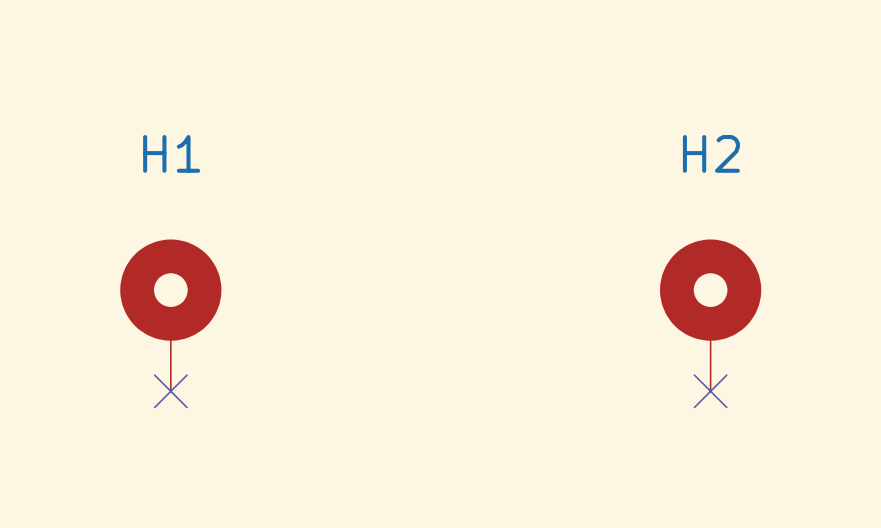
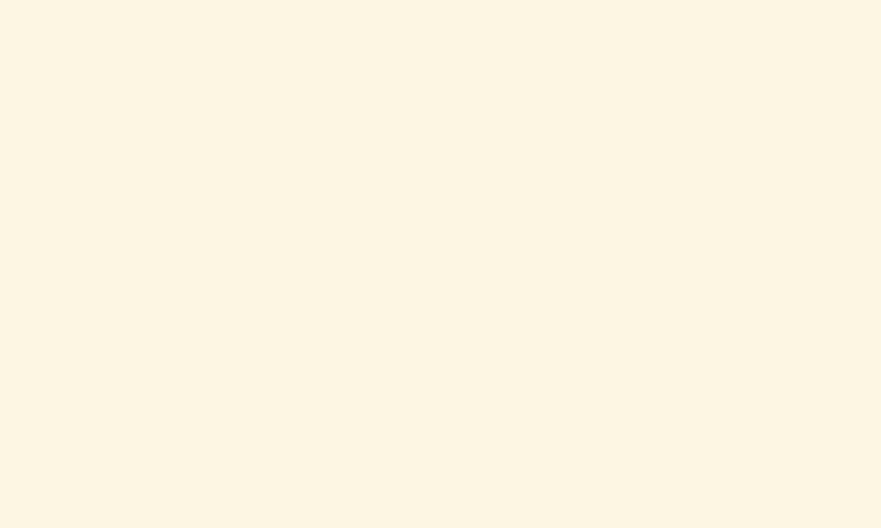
H1: (170, 315) -> none
H2: (710, 315) -> none
no-connect mark: (170, 391) -> none
no-connect mark: (710, 391) -> none

